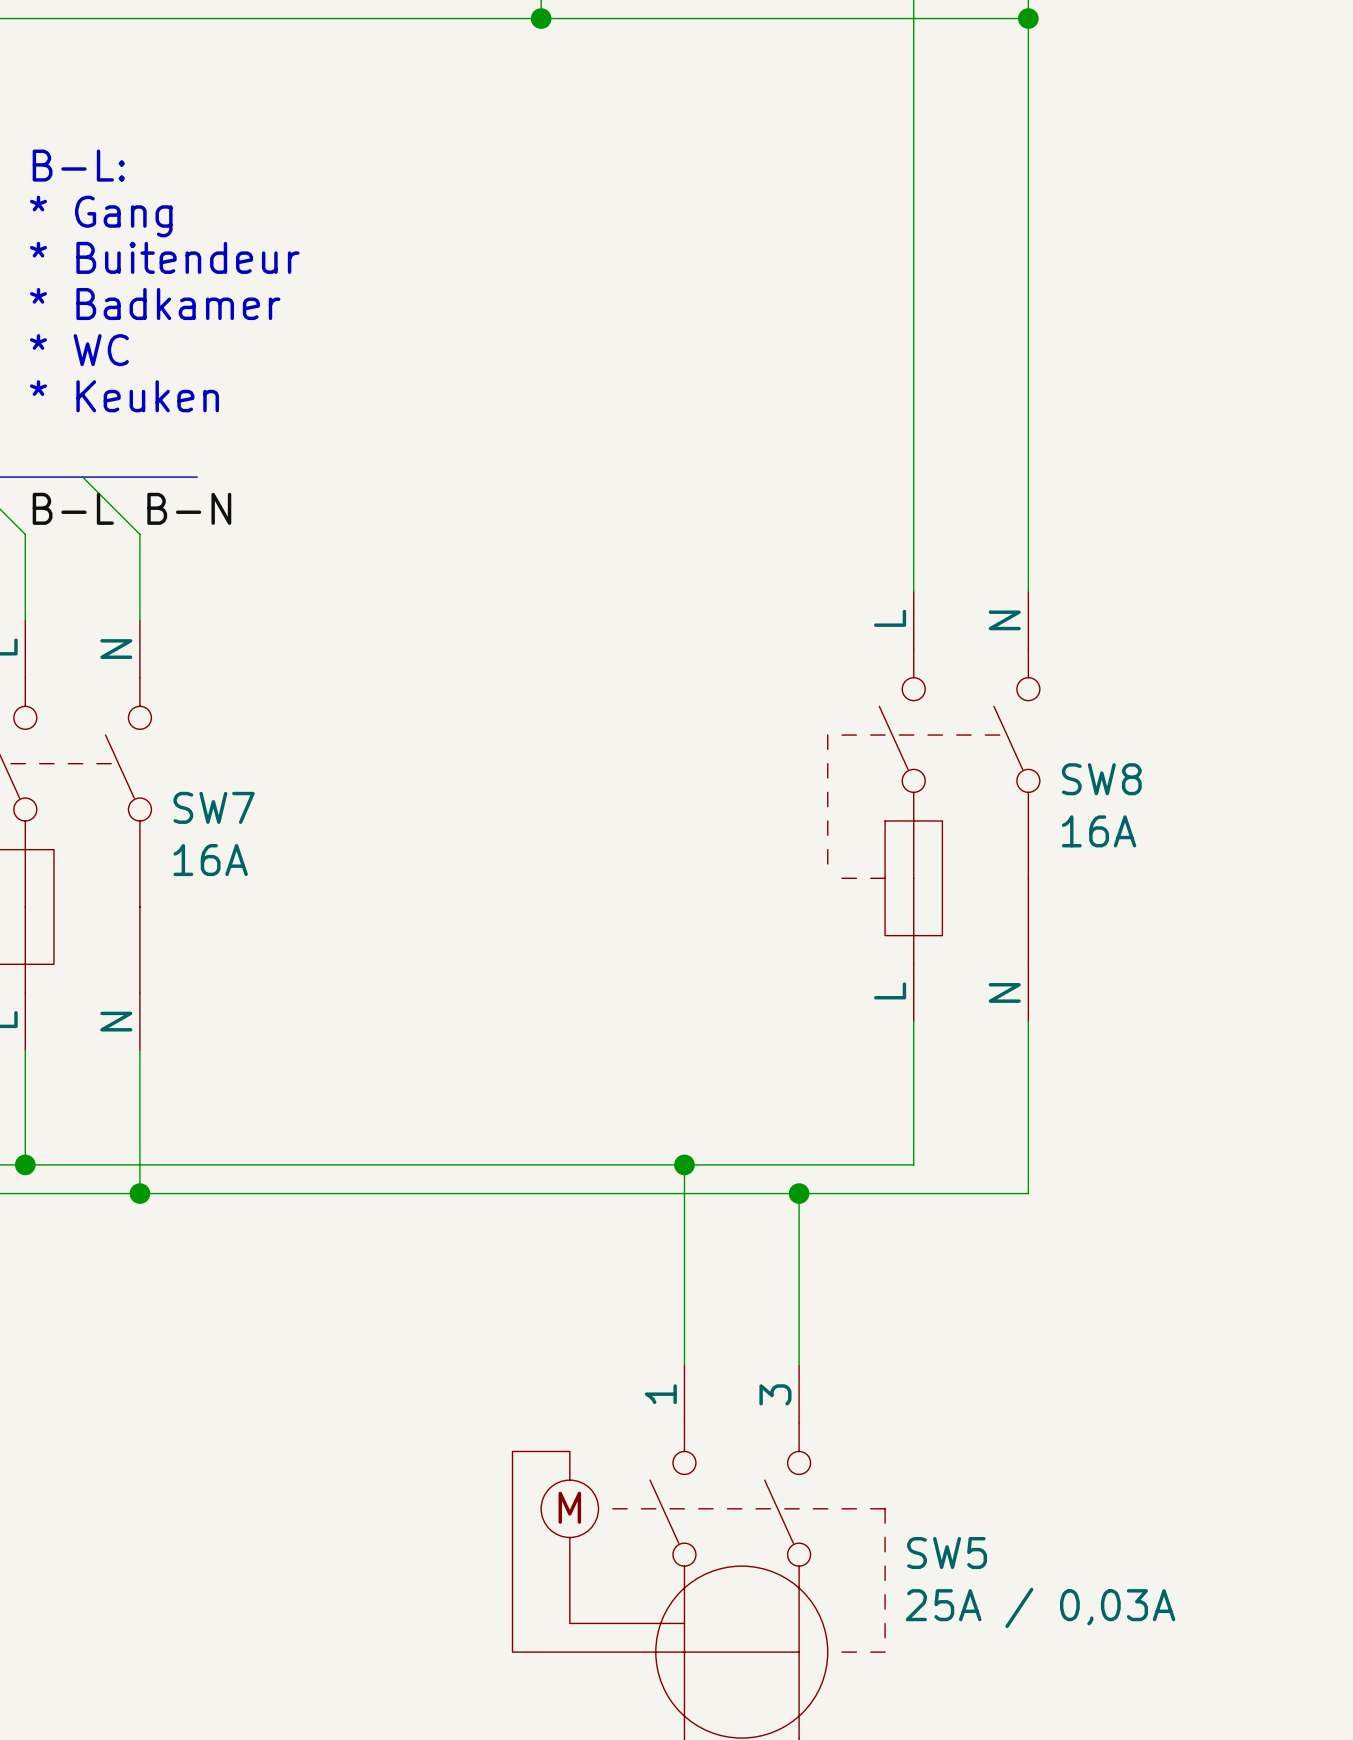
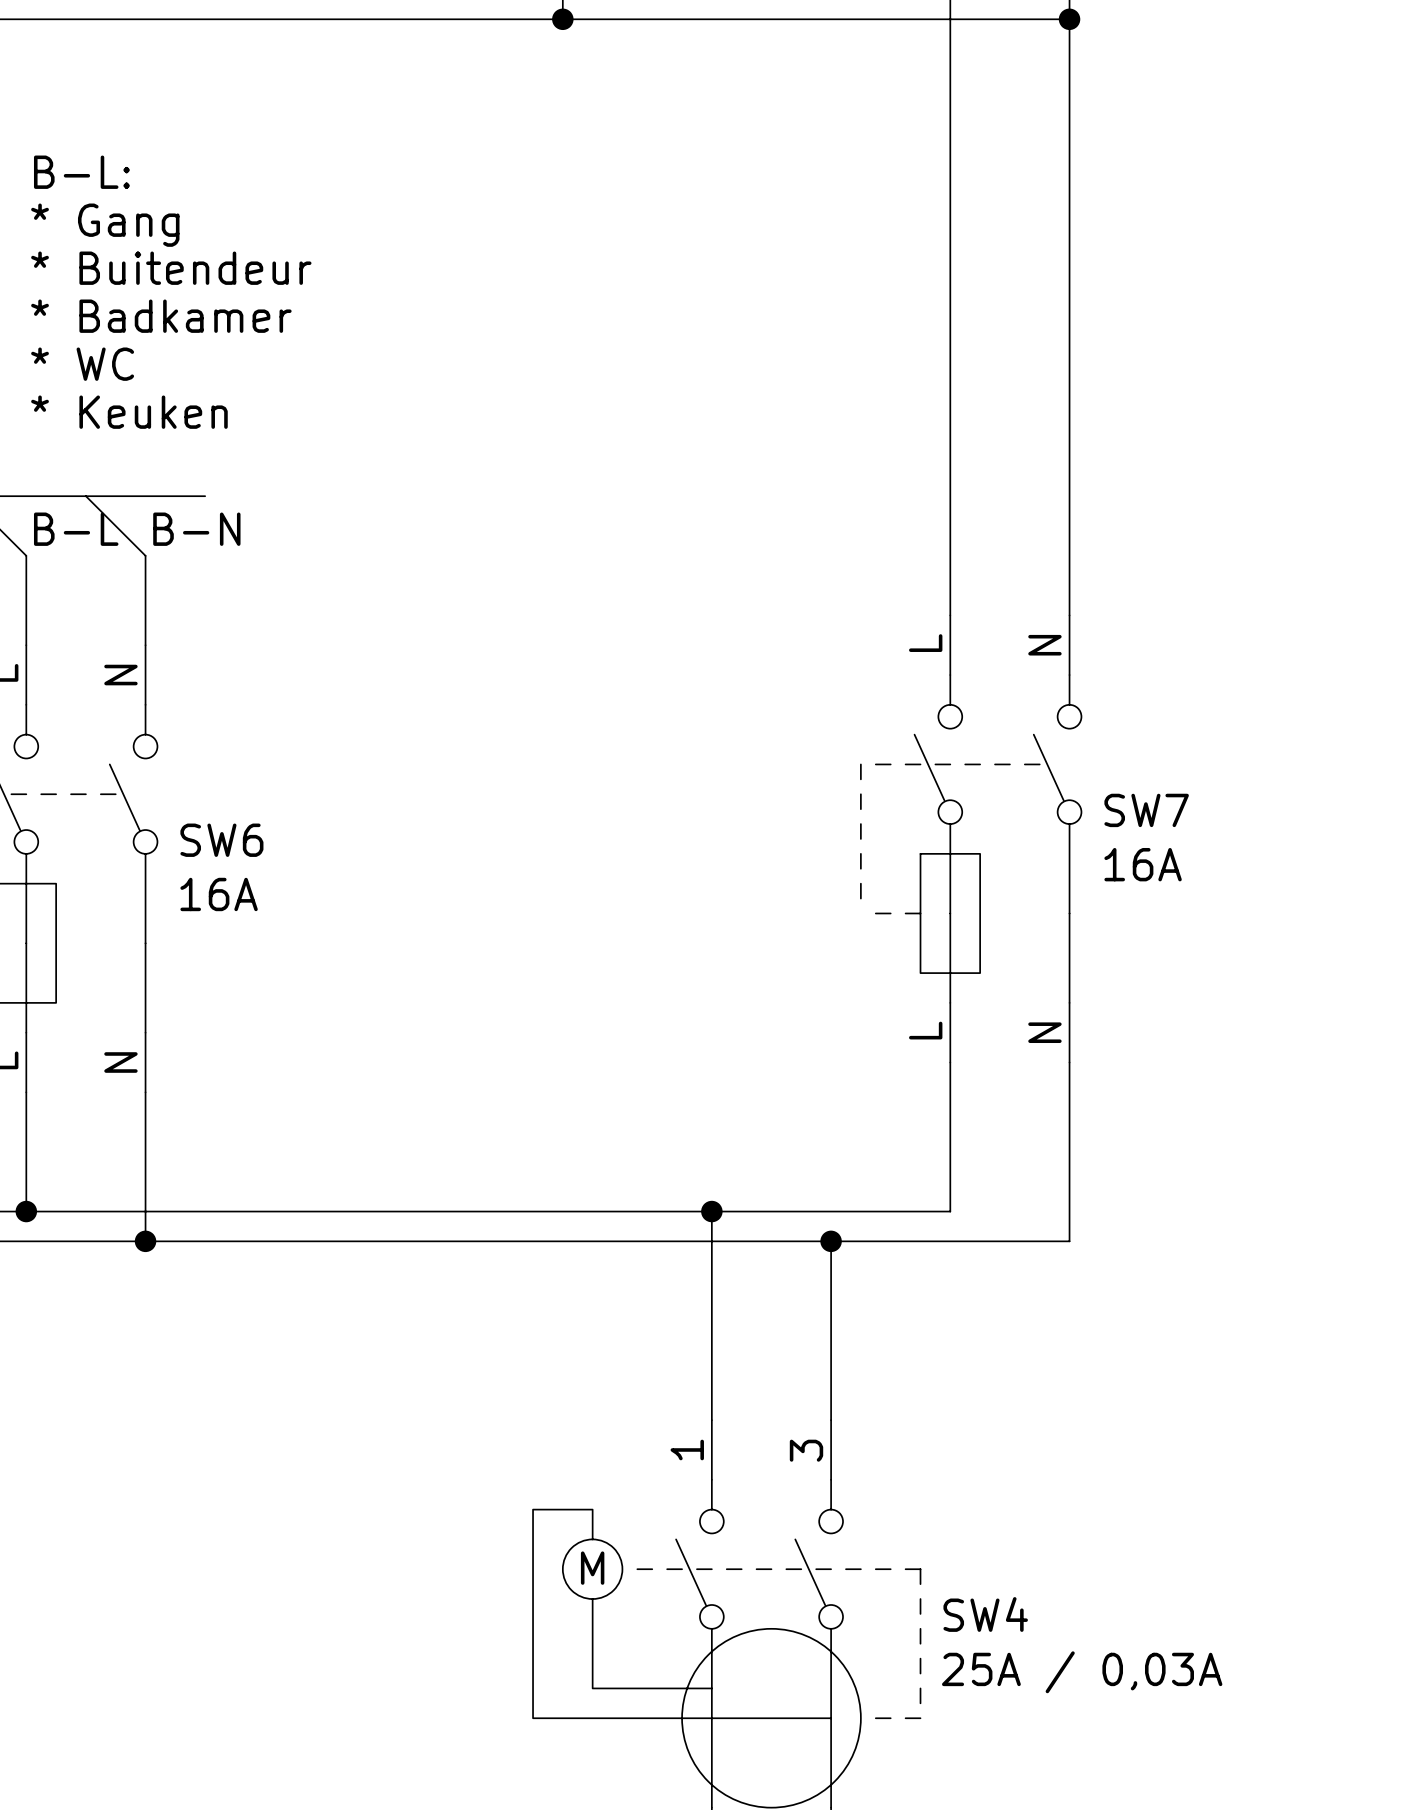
SW8 name: SW8 (1101, 779) -> SW7 (1146, 810)
SW7 name: SW7 (214, 807) -> SW6 (221, 840)
SW5 name: SW5 (947, 1553) -> SW4 (985, 1614)

